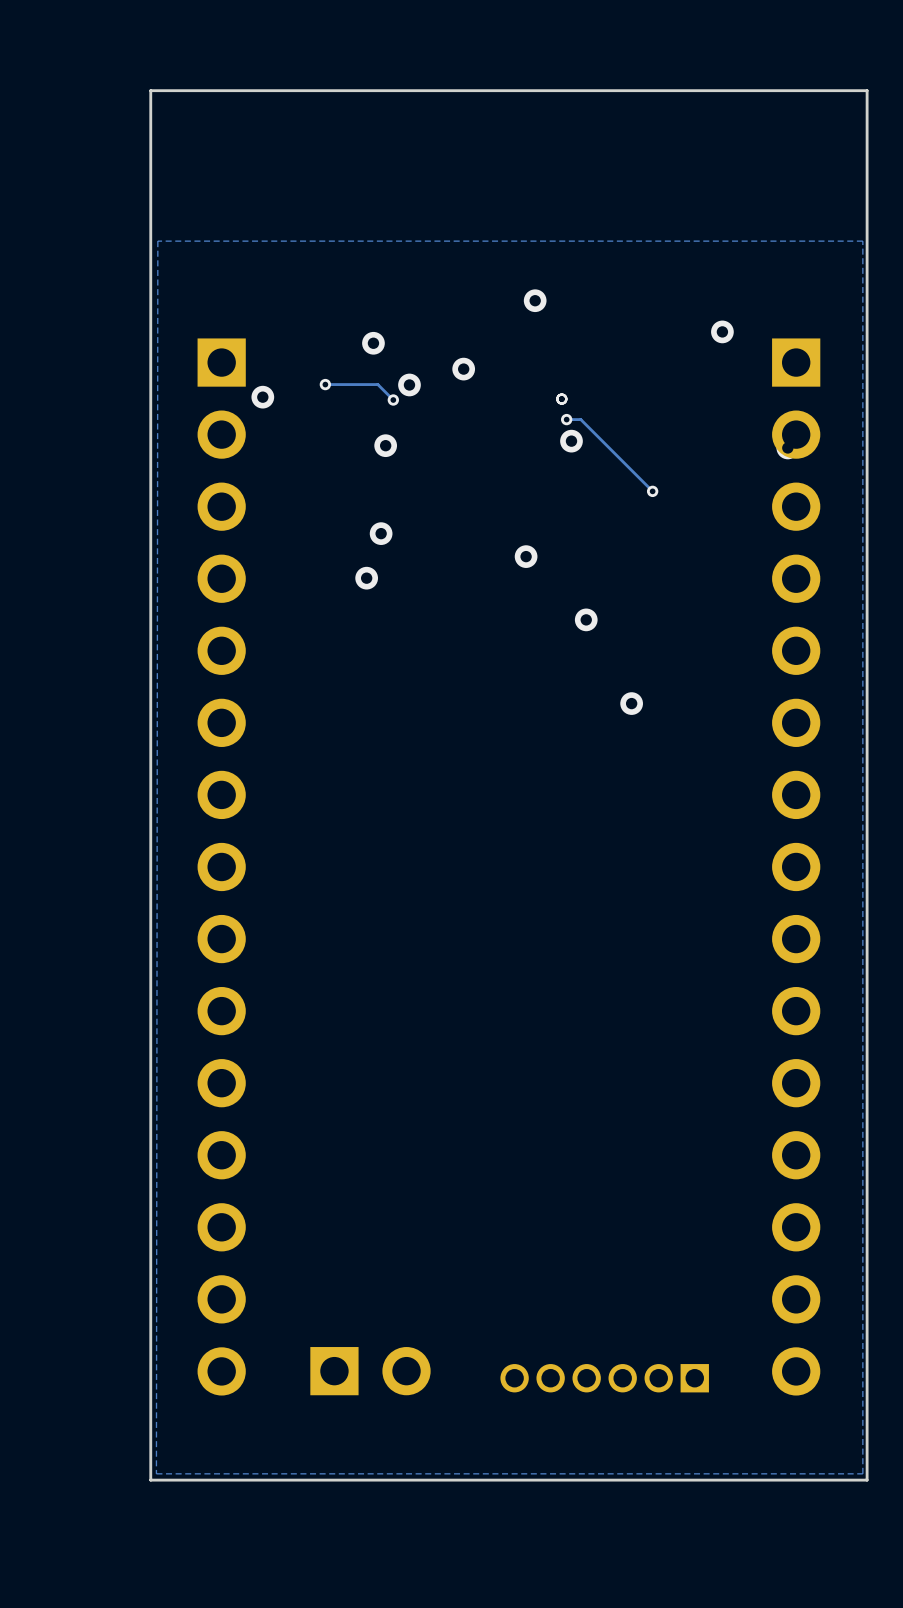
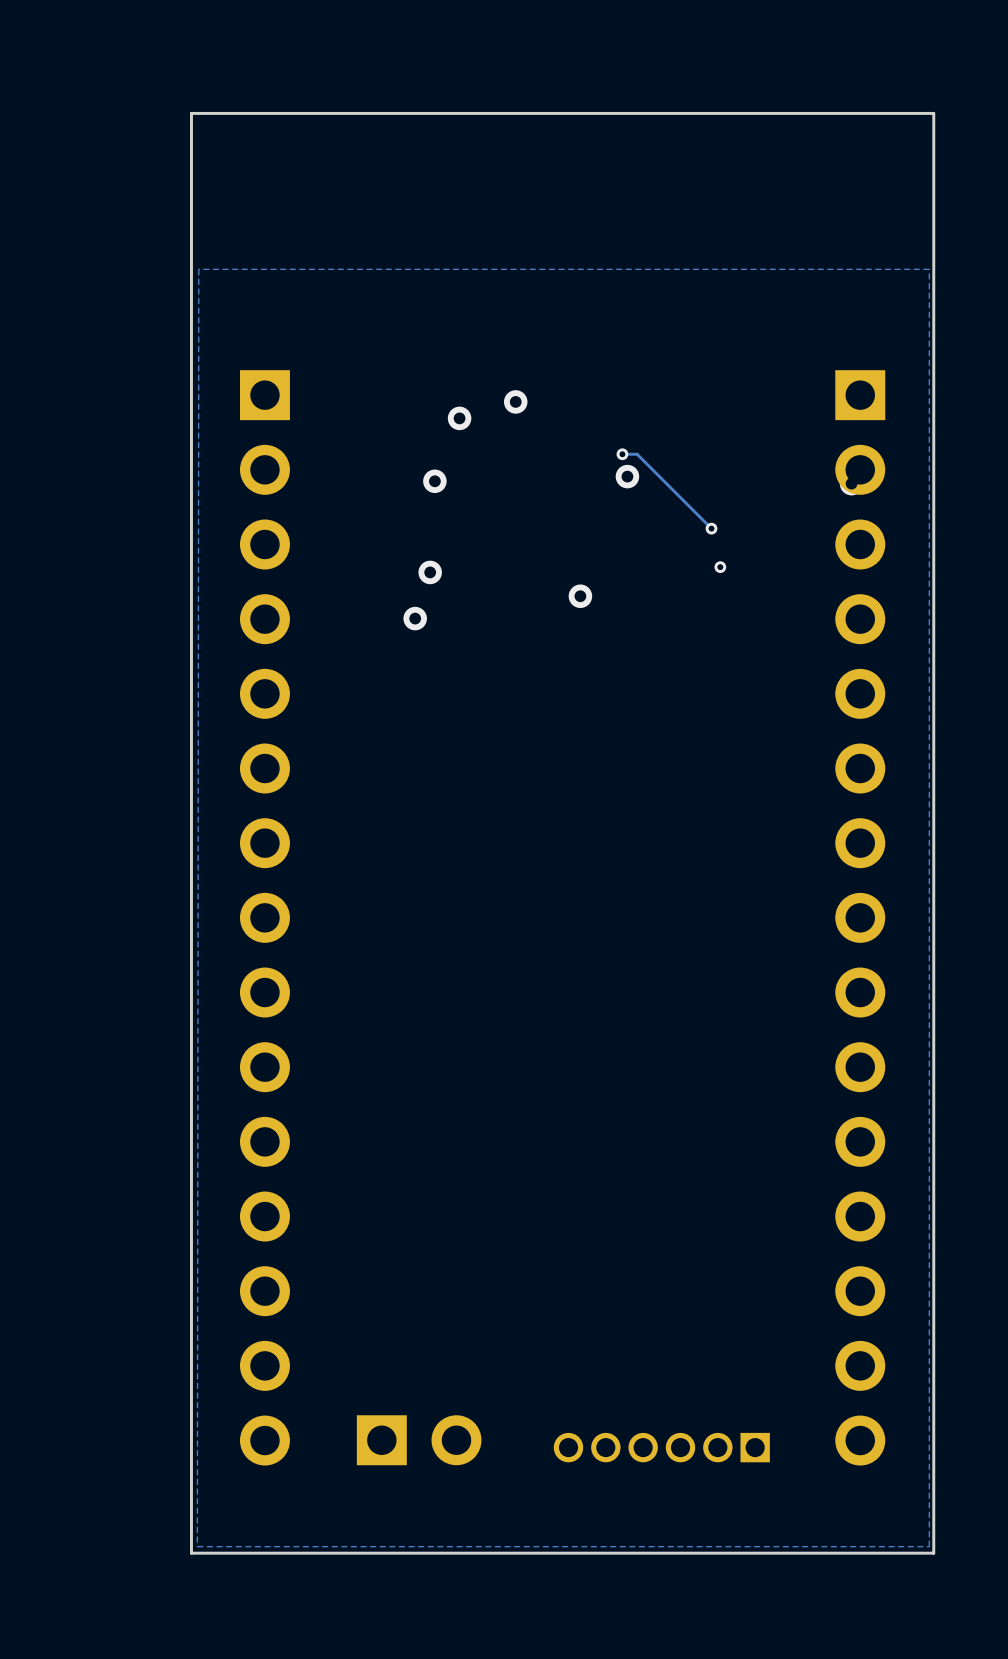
via: (535, 300) -> none
via: (722, 331) -> none
via: (373, 343) -> none
track: (325, 384) (377, 384) (393, 400) -> none
via: (325, 384) -> none
via: (262, 397) -> none
via: (561, 399) -> none
via: (393, 400) -> none
via: none -> (720, 567)
via: (586, 619) -> none
via: (631, 703) -> none

